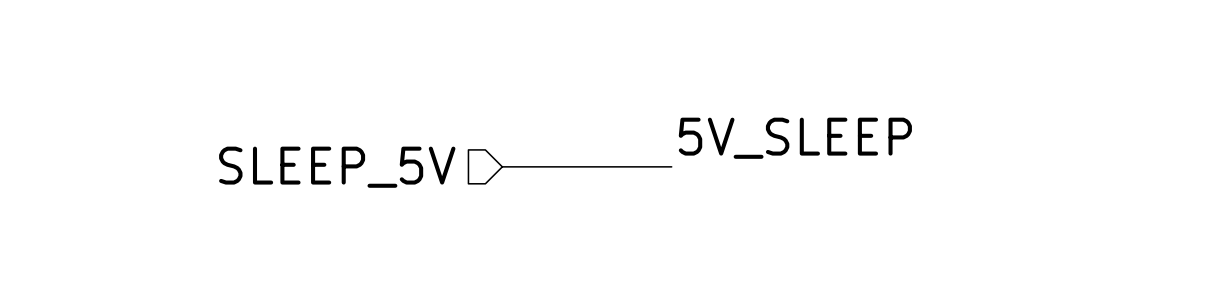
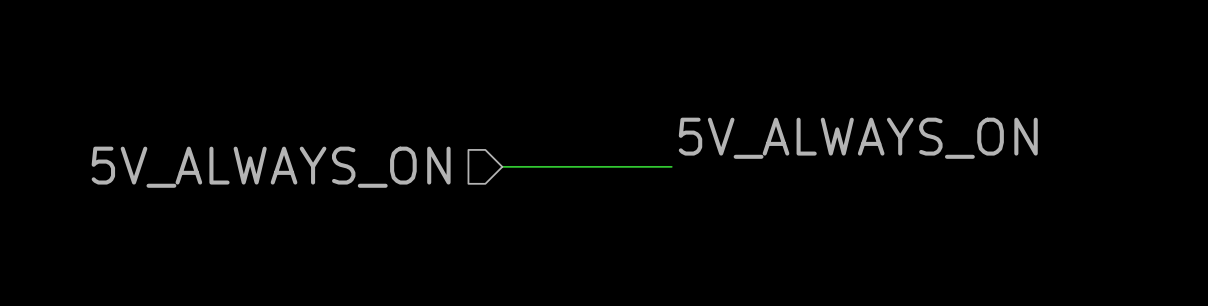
label: 5V_SLEEP (795, 138) -> 5V_ALWAYS_ON (858, 138)
hierarchical label: SLEEP_5V (337, 167) -> 5V_ALWAYS_ON (271, 167)

